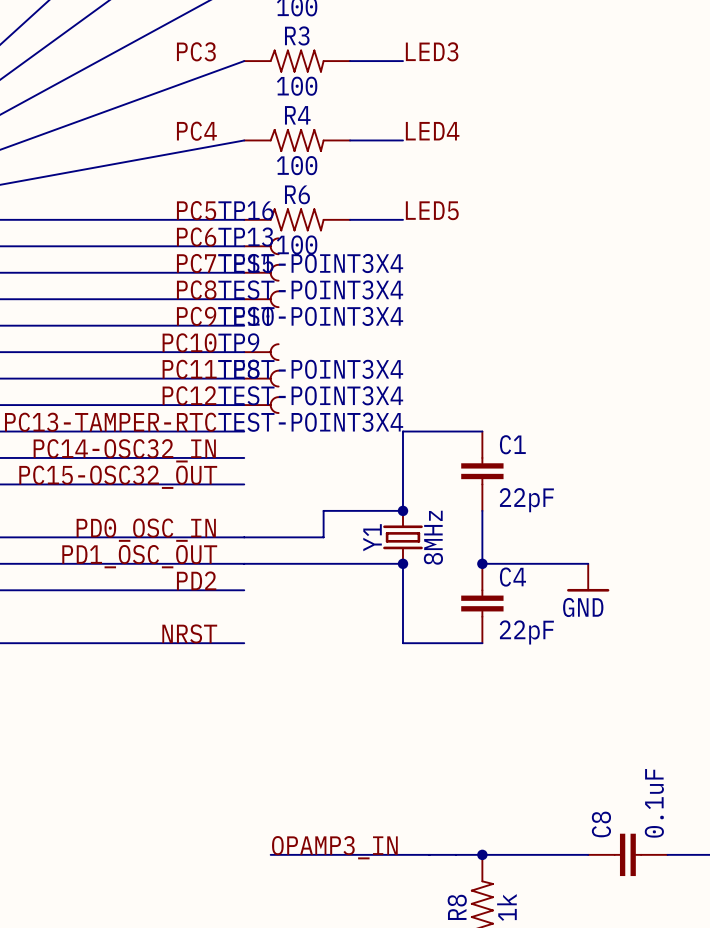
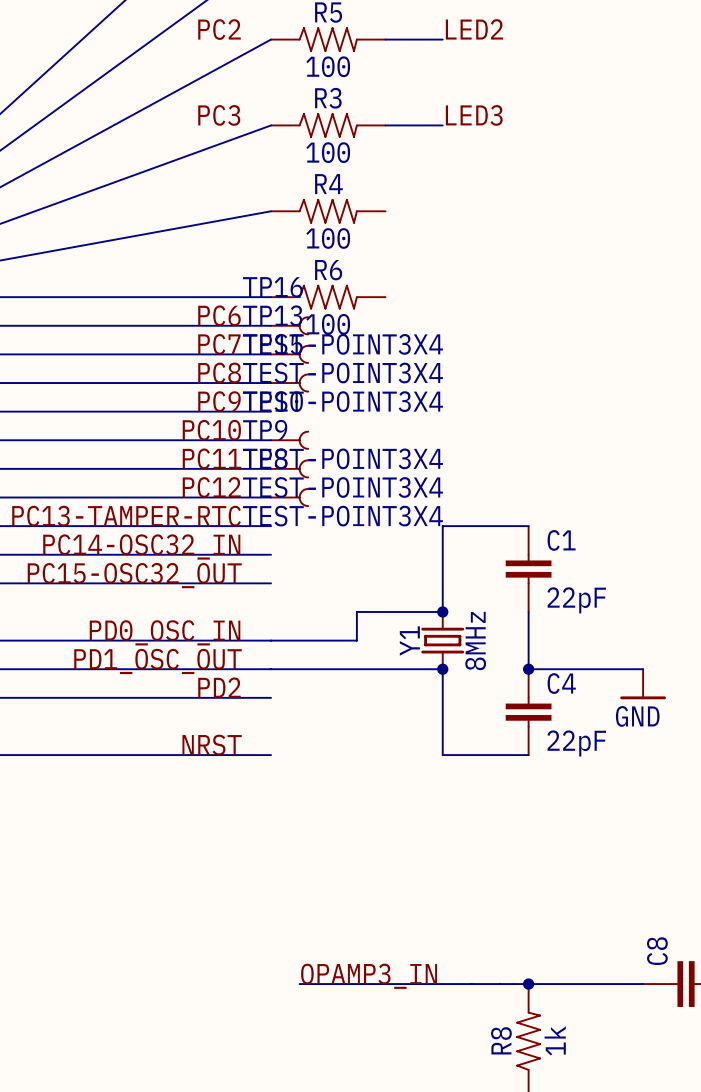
label: PC4 (196, 131) -> none
label: LED4 (432, 131) -> none
wire: (350, 140) (402, 140) -> none
label: PC5 (196, 210) -> none
label: LED5 (432, 210) -> none
wire: (350, 219) (402, 219) -> none

